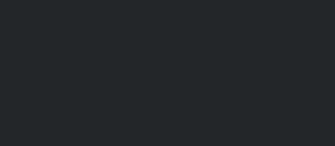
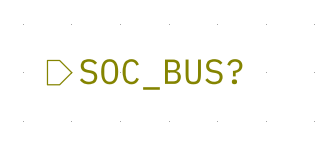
hierarchical label: none -> SOC_BUS? (161, 74)

